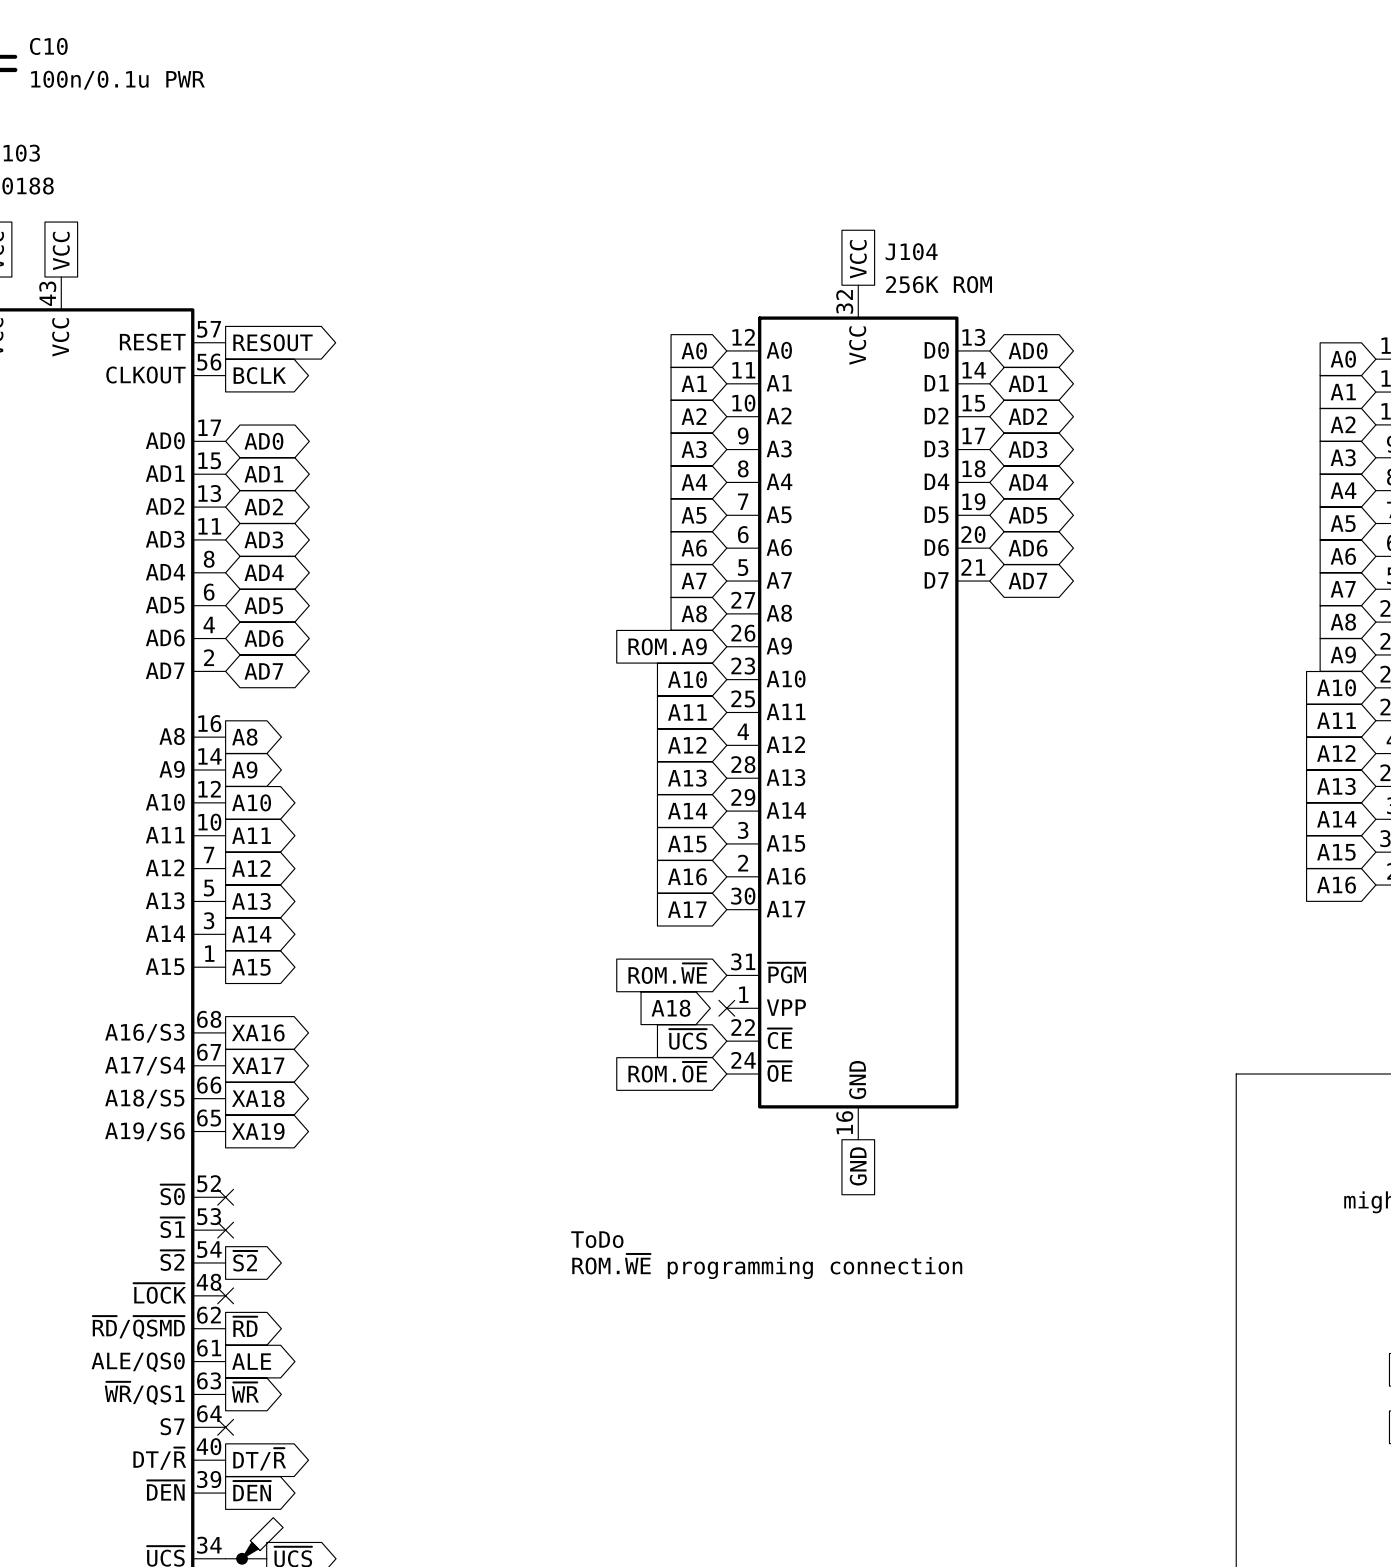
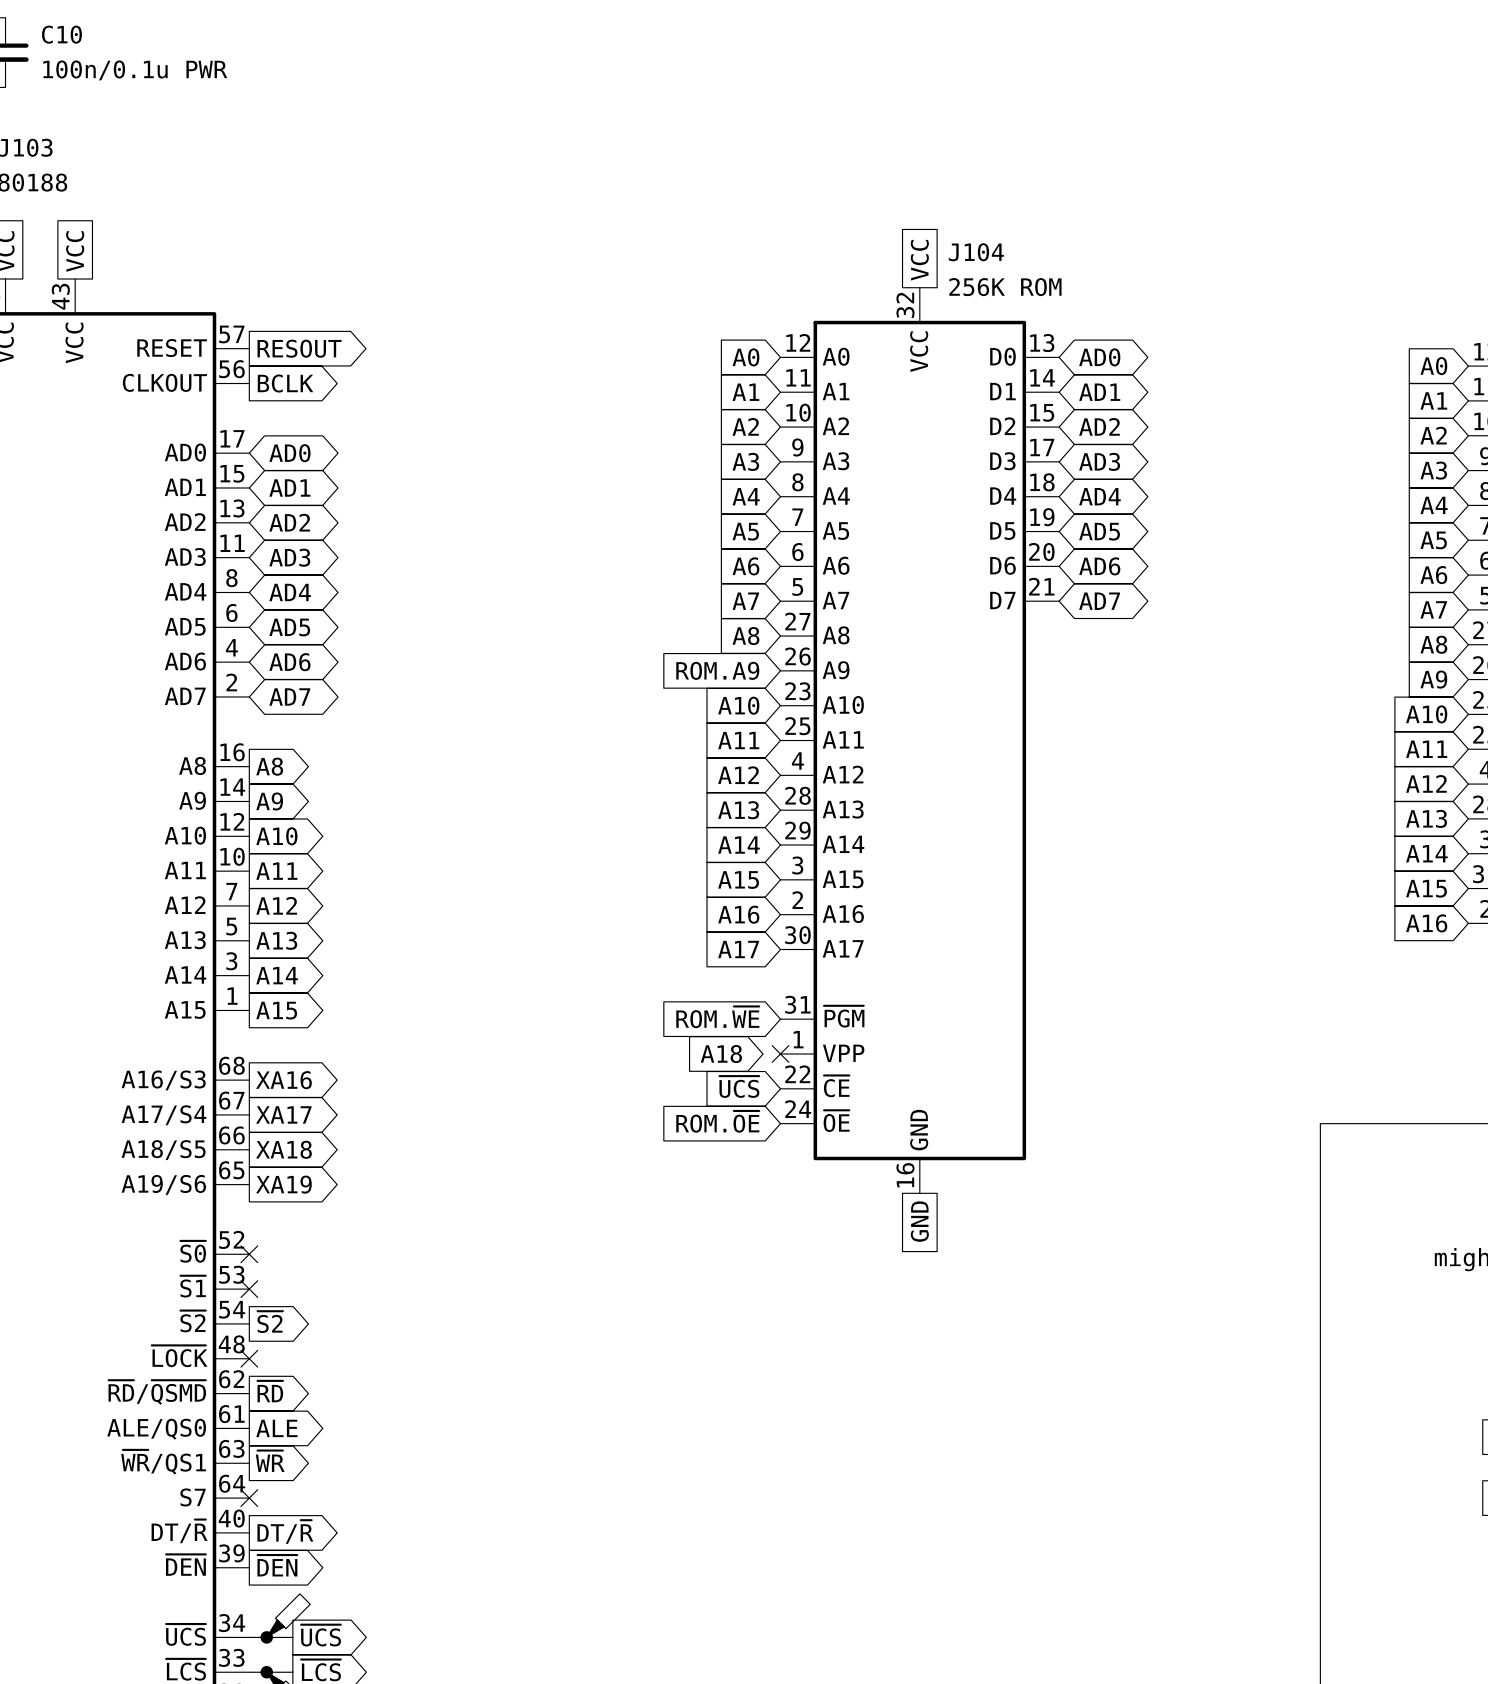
text: ToDo (597, 1239) -> none
text: ROM.~{WE} programming connection (767, 1266) -> none

